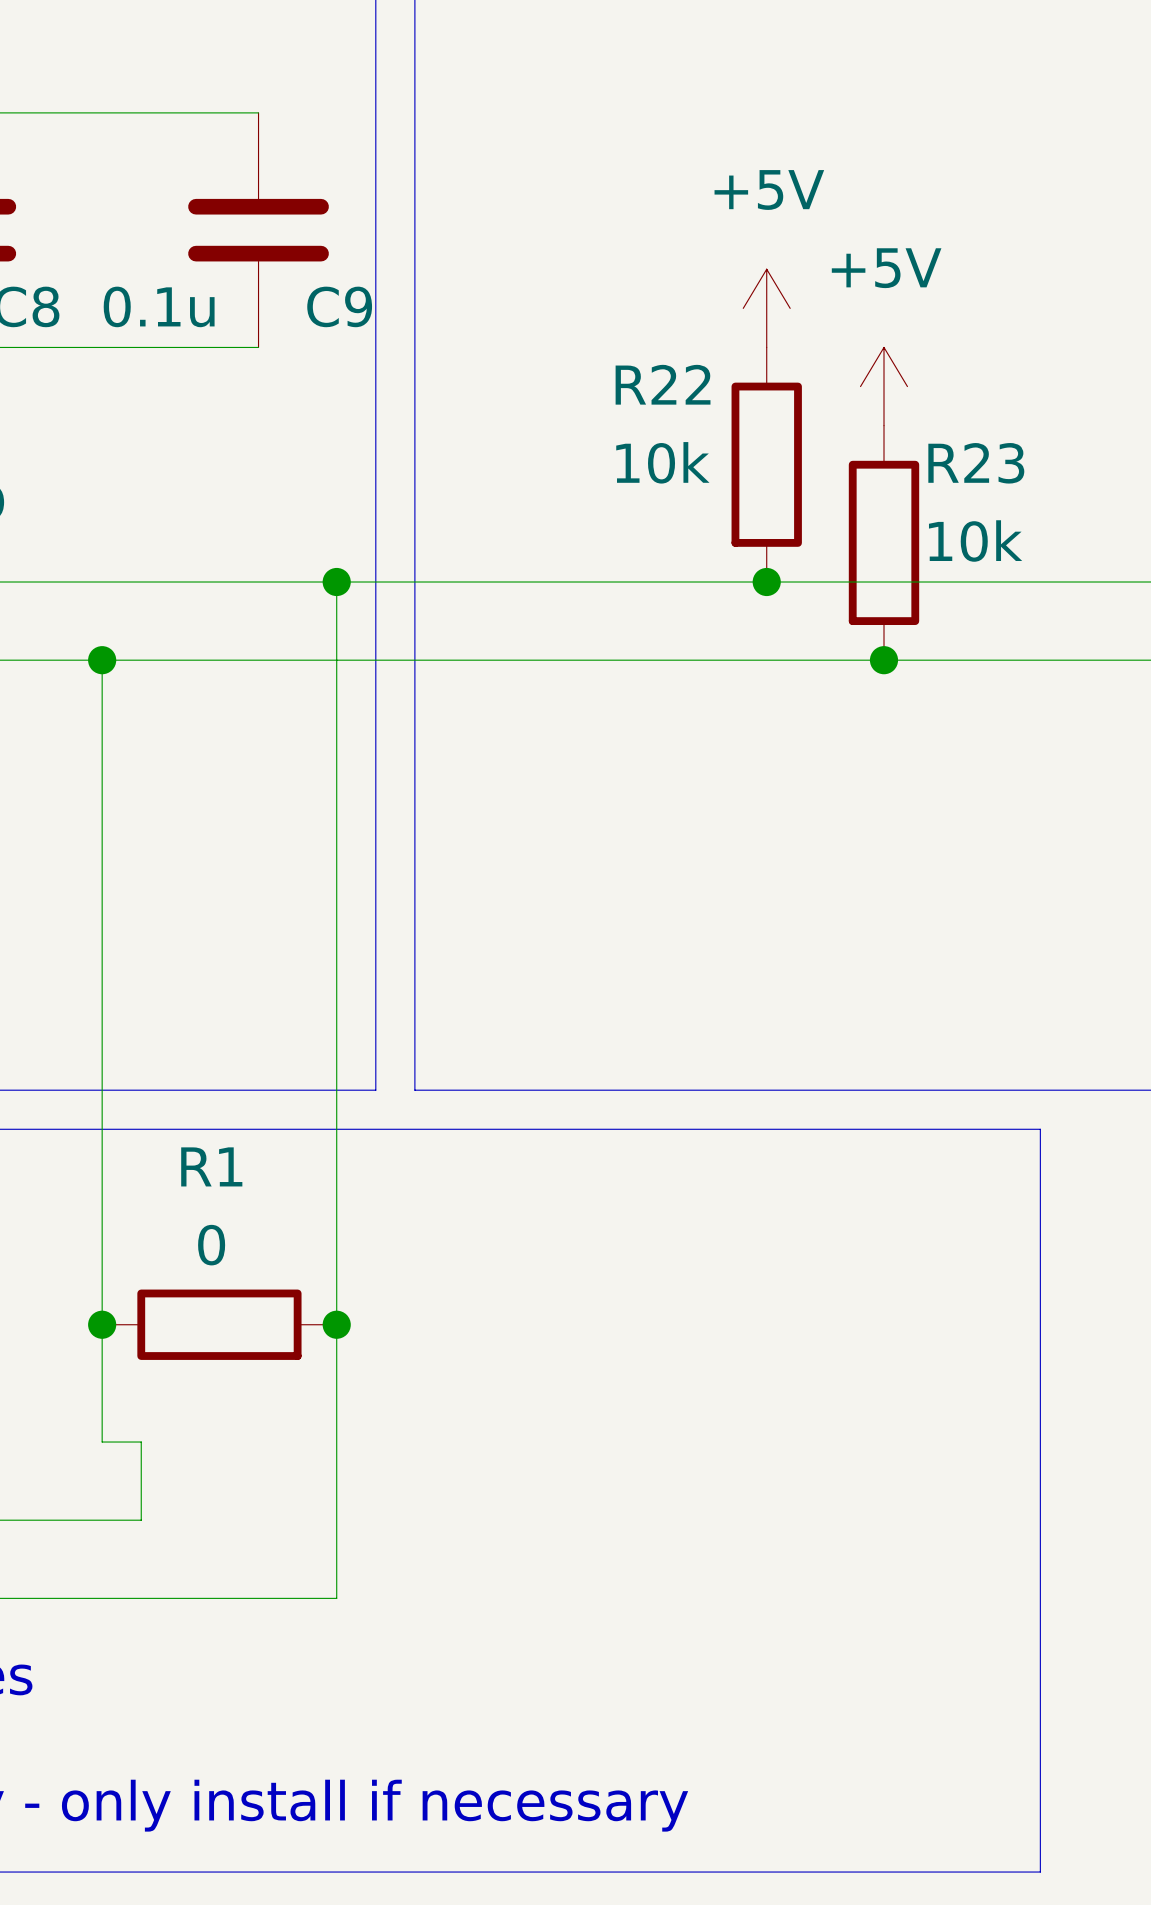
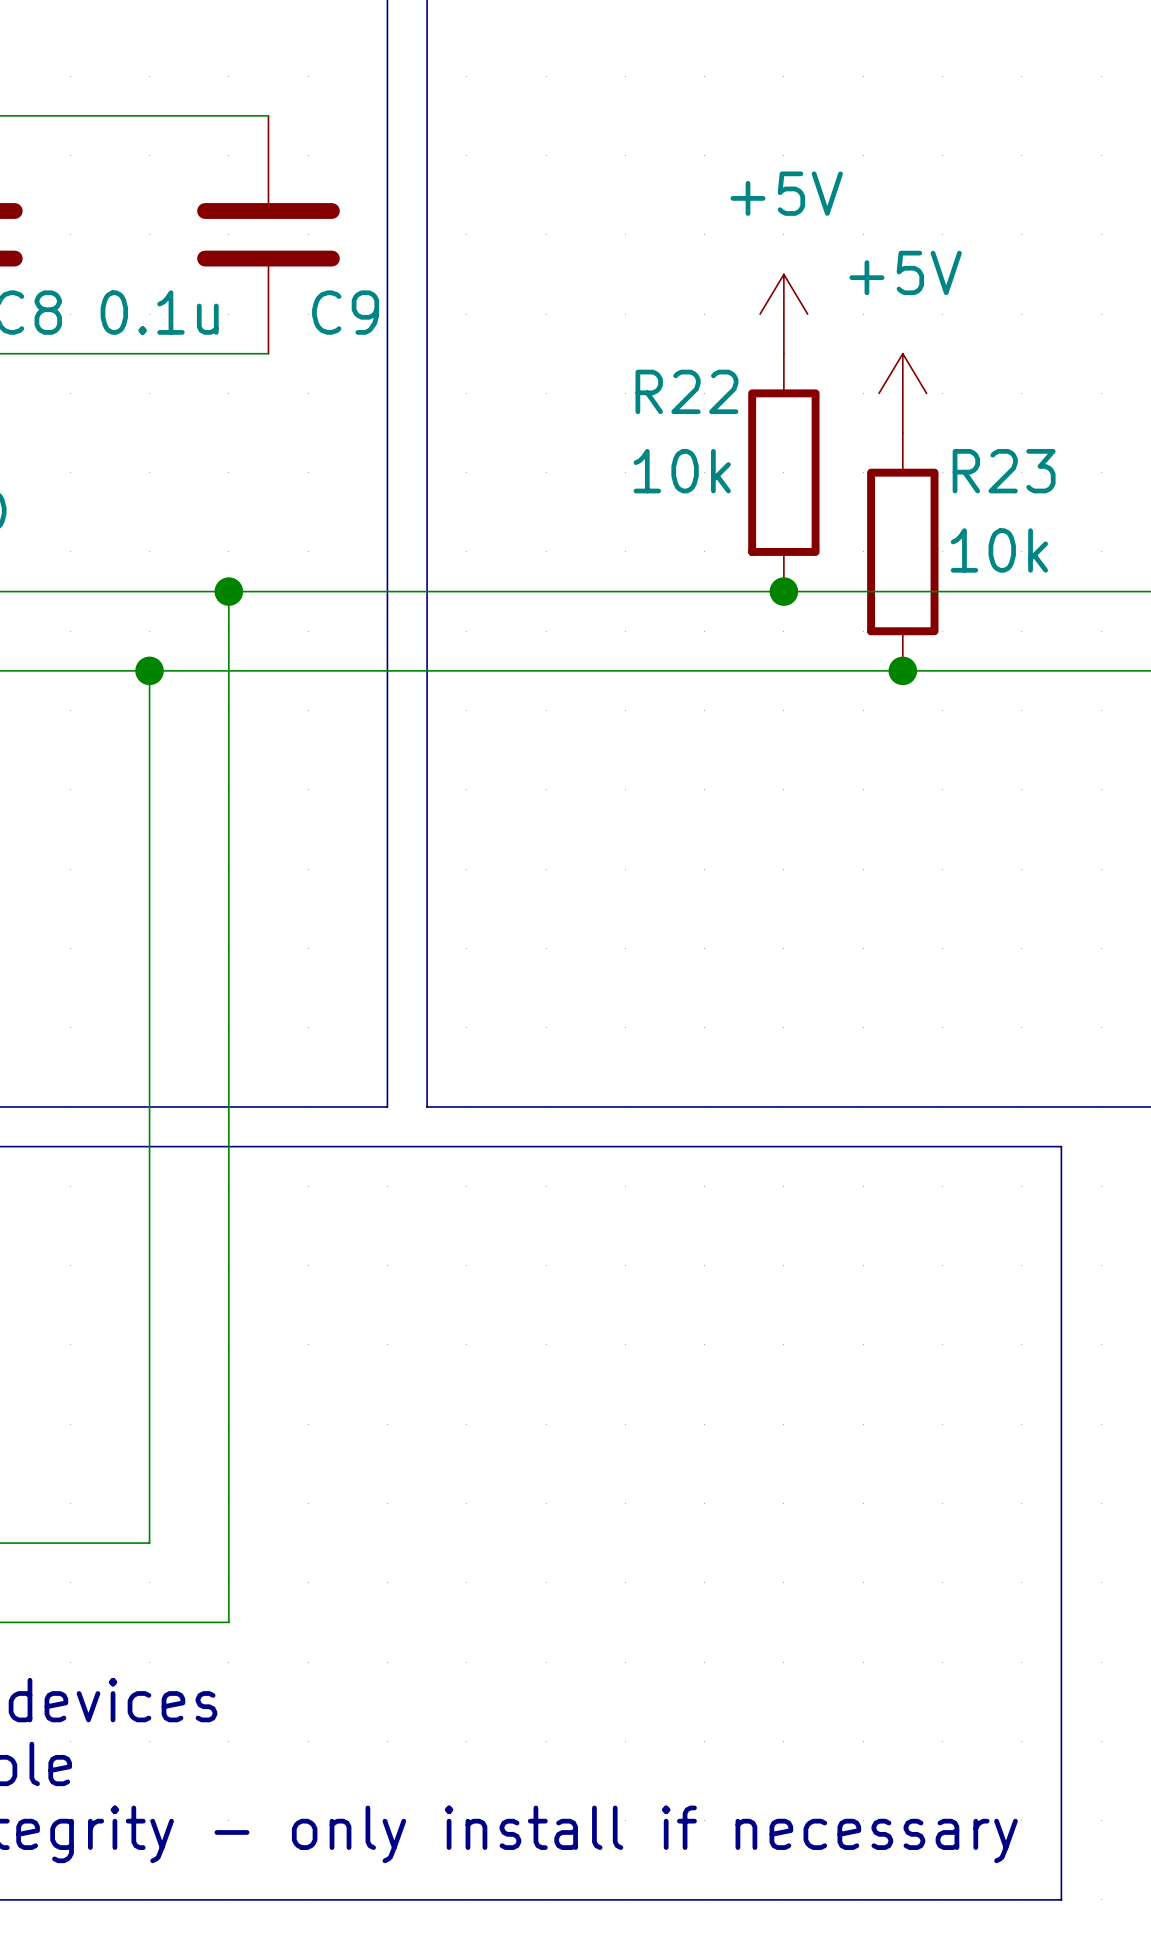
junction: none -> (228, 591)
wire: (336, 582) (336, 1598) (219, 1598) -> (228, 591) (228, 1622)
junction: (336, 582) -> none
wire: (102, 660) (102, 1442) (141, 1442) -> (149, 670) (149, 1463)
junction position: (102, 660) -> (149, 670)
junction: (102, 1324) -> none
R1: 0 (219, 1324) -> none
junction: (336, 1324) -> none

